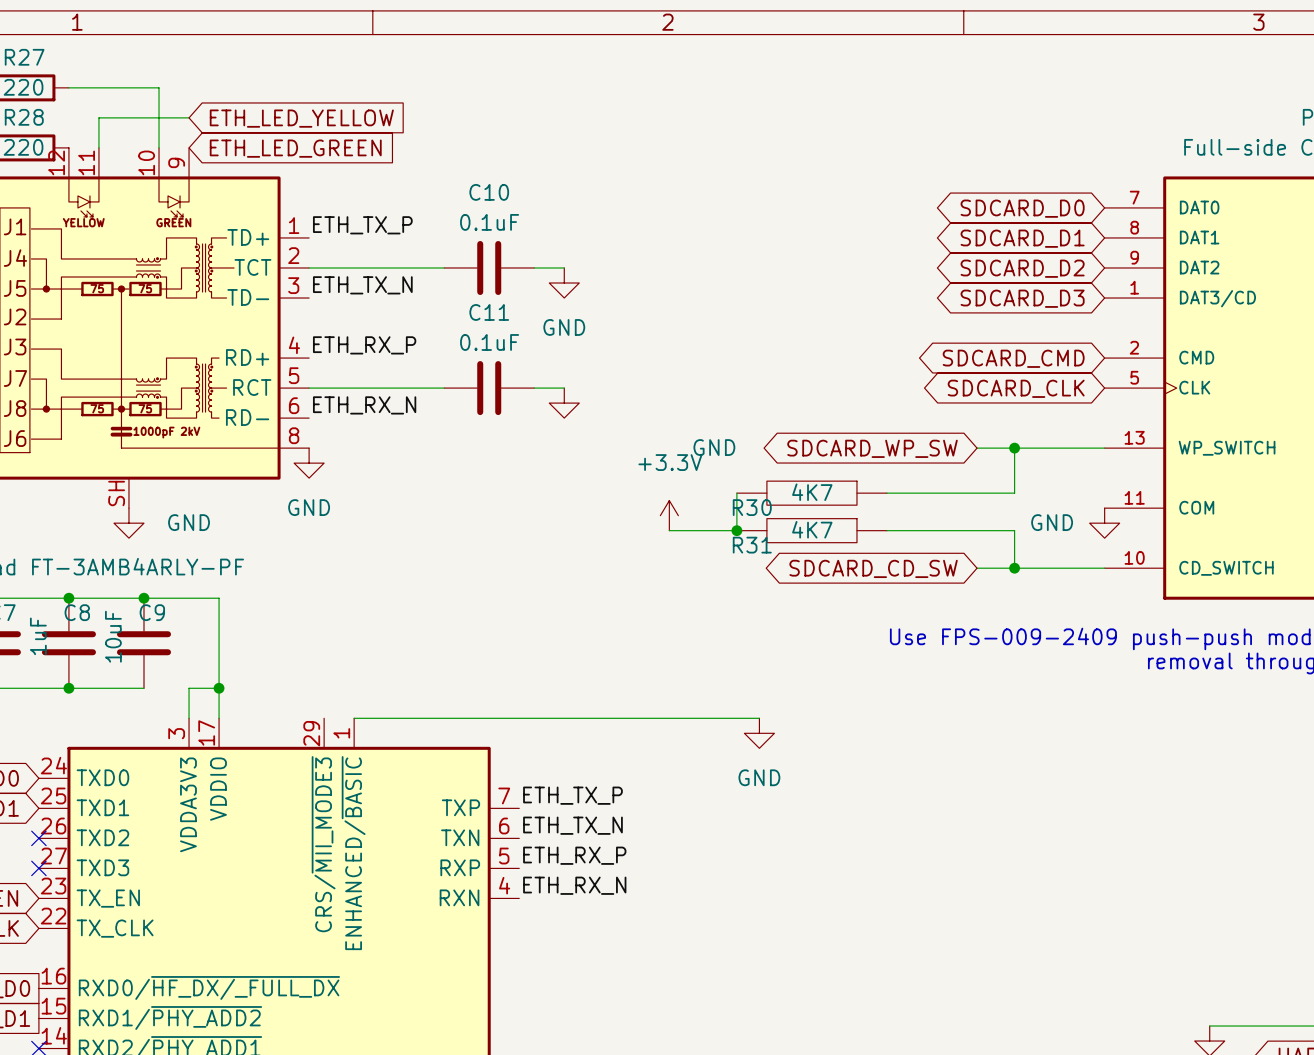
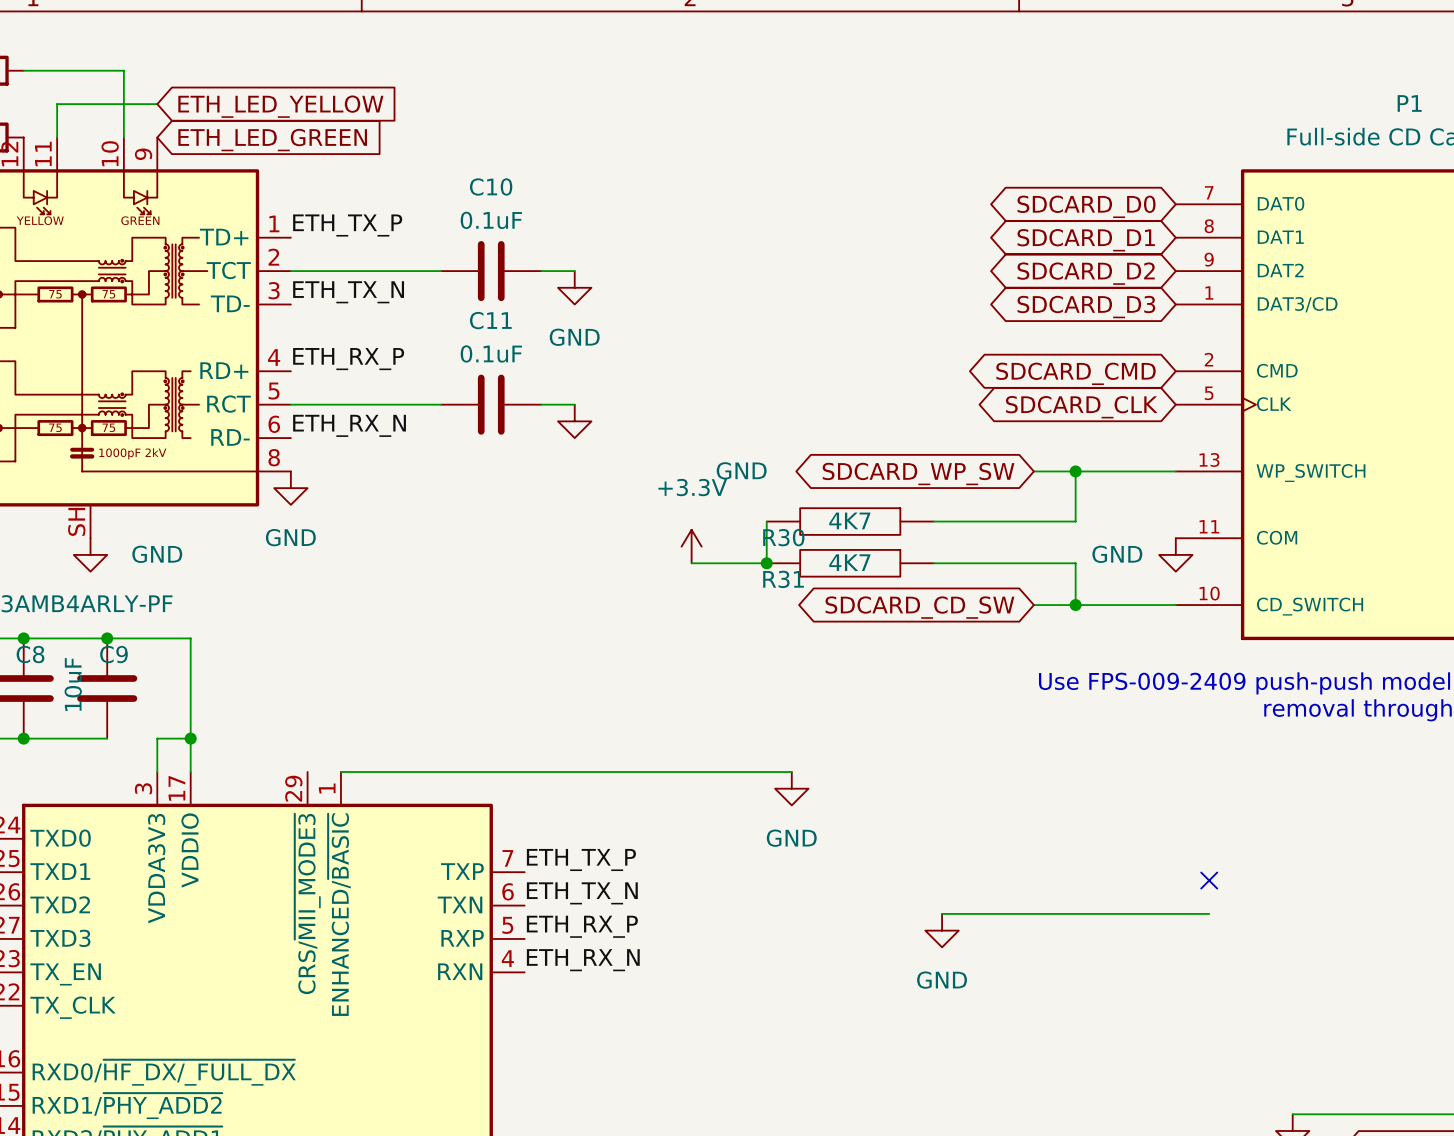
no-connect mark: none -> (1209, 880)
wire: none -> (942, 913) (1209, 913)
power symbol: none -> GND (942, 930)

